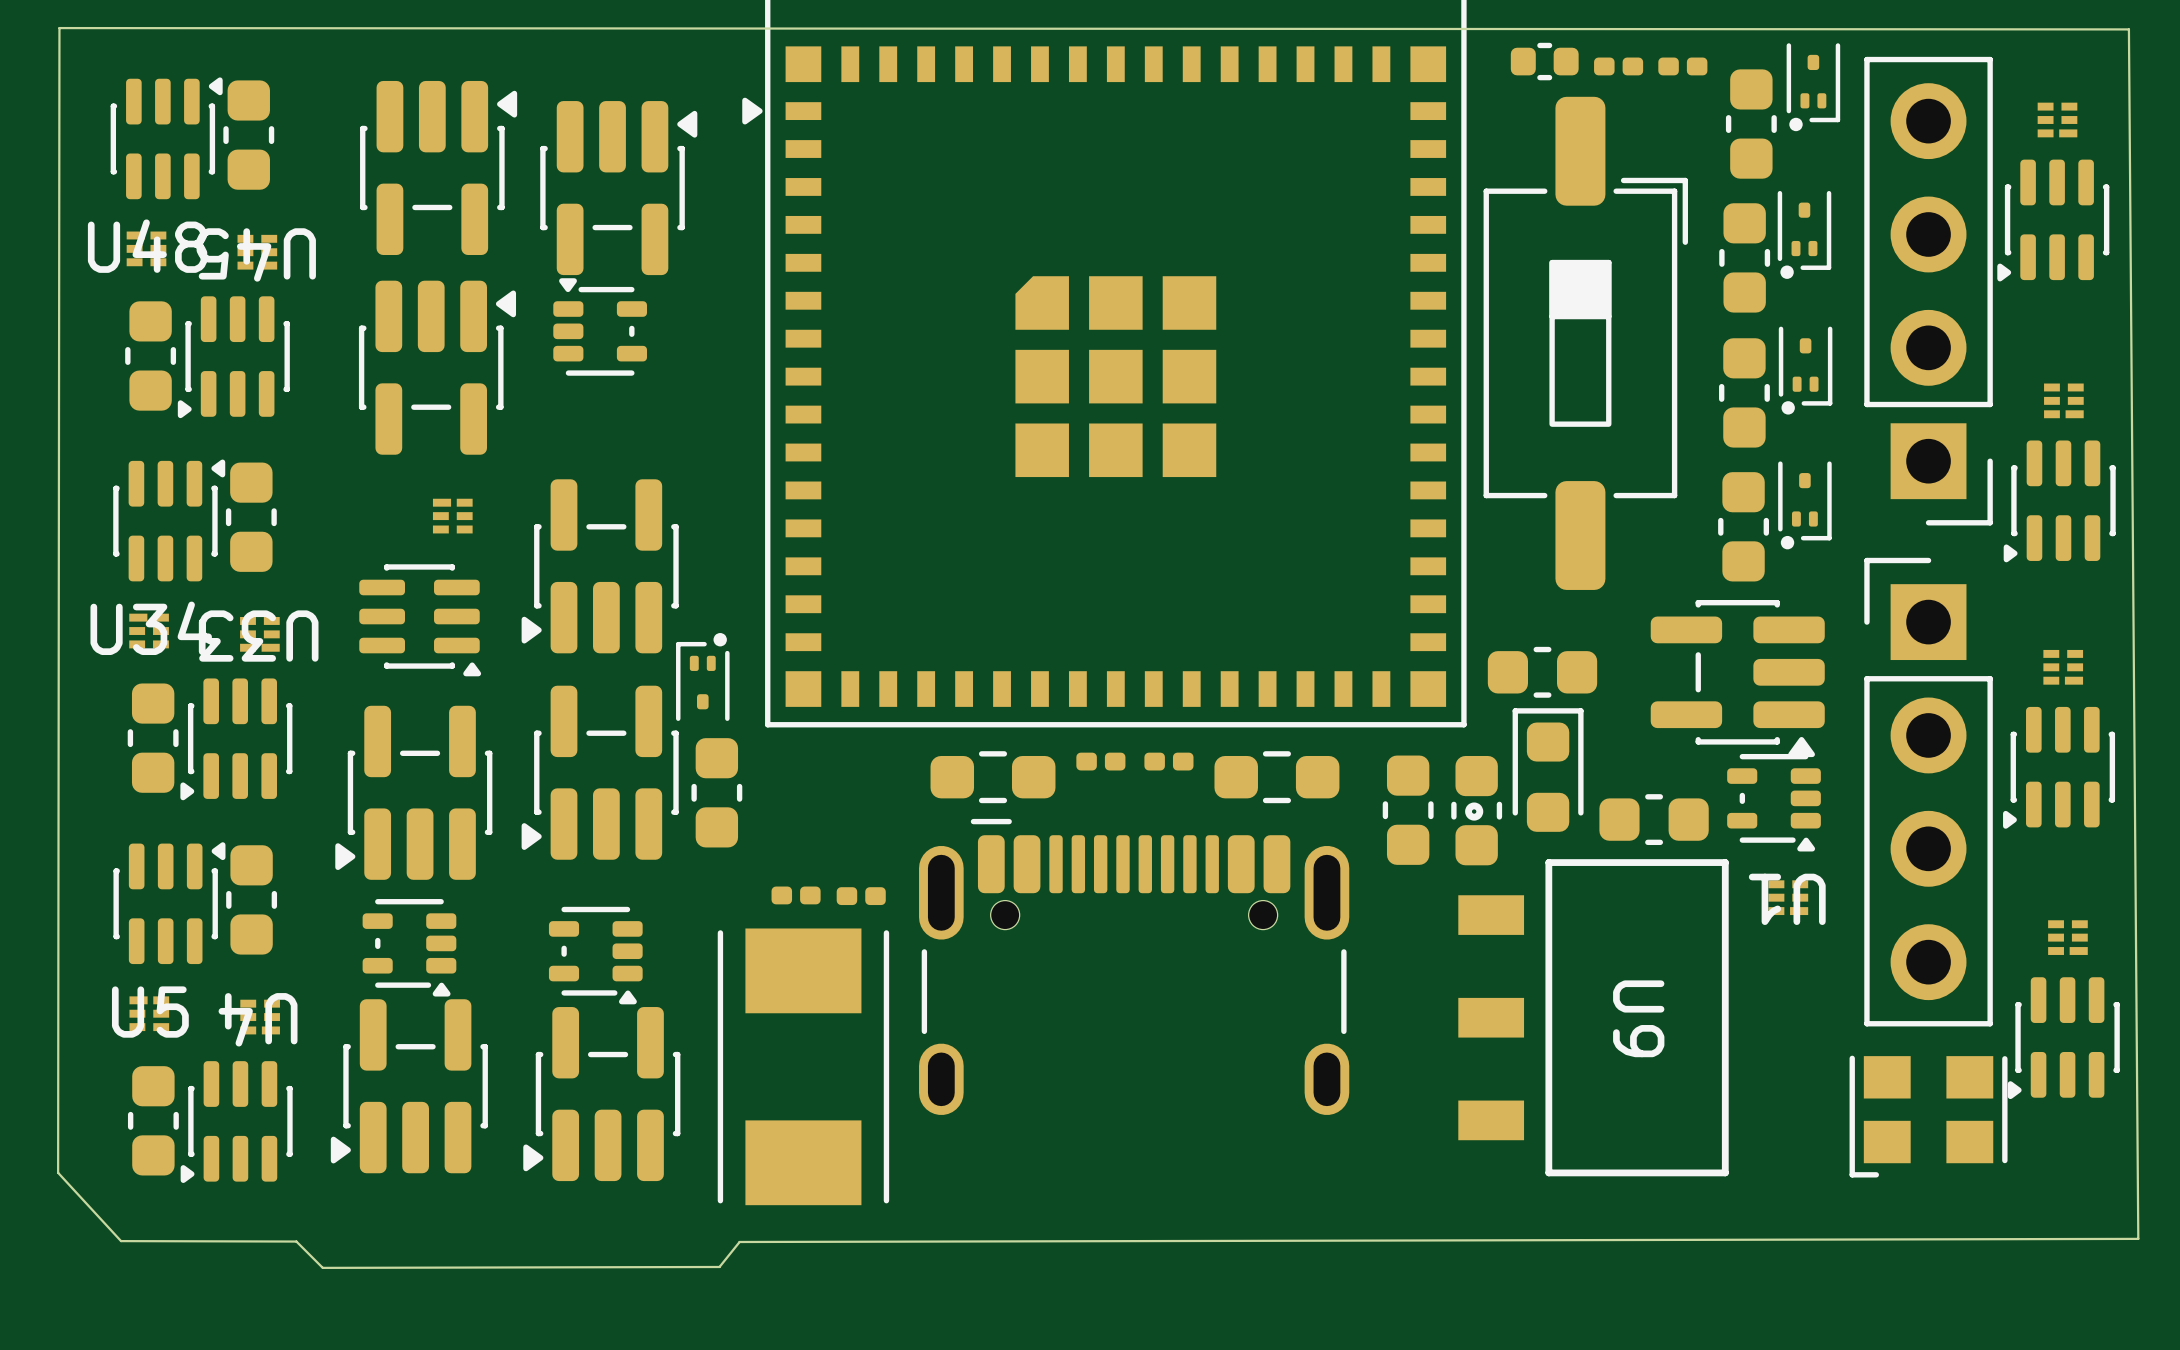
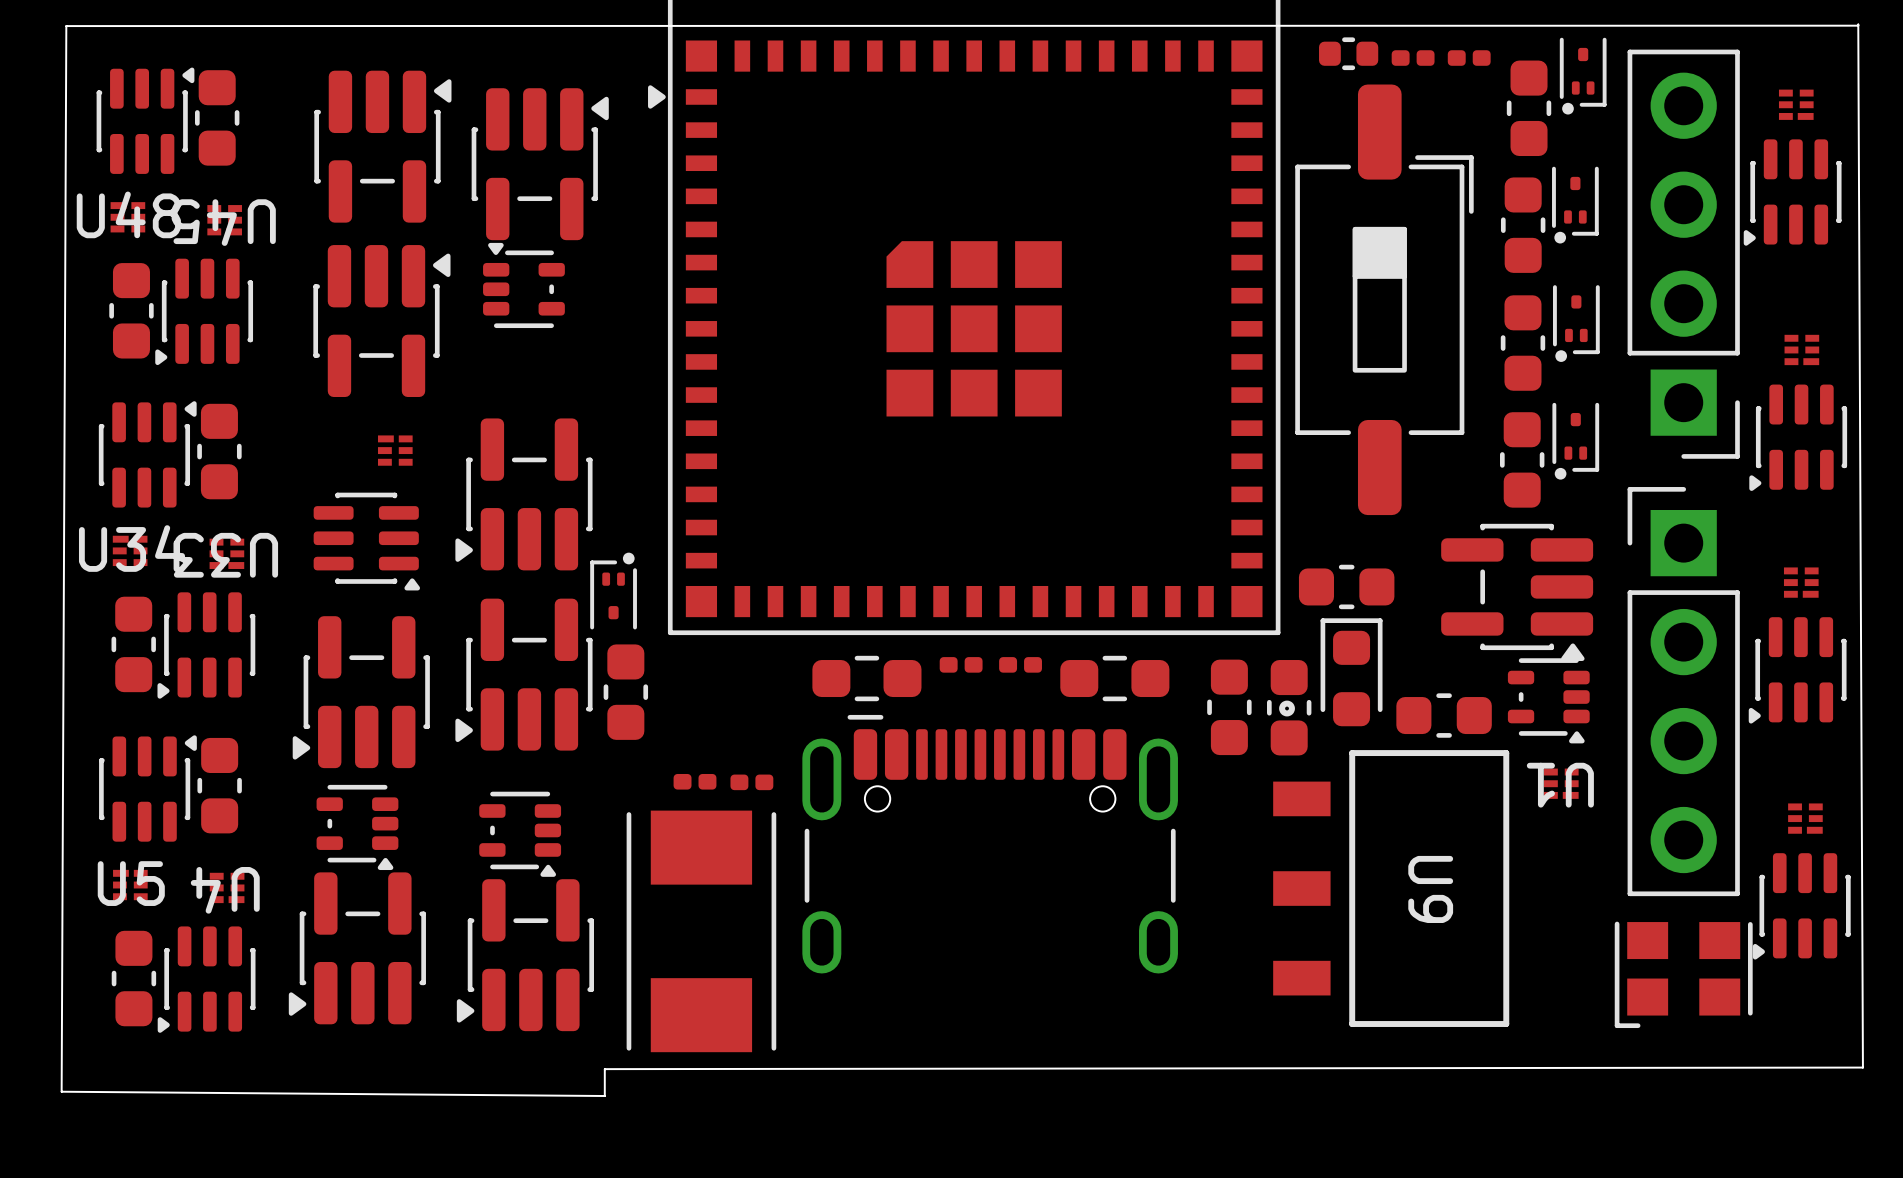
board edge: (59, 28) (58, 1172) (121, 1241) (296, 1241) (322, 1267) (719, 1266) (739, 1241) (2138, 1238) (2128, 29) (59, 28) -> (1858, 24) (66, 26) (61, 1091) (604, 1096) (604, 1069) (1862, 1067) (1858, 24)

